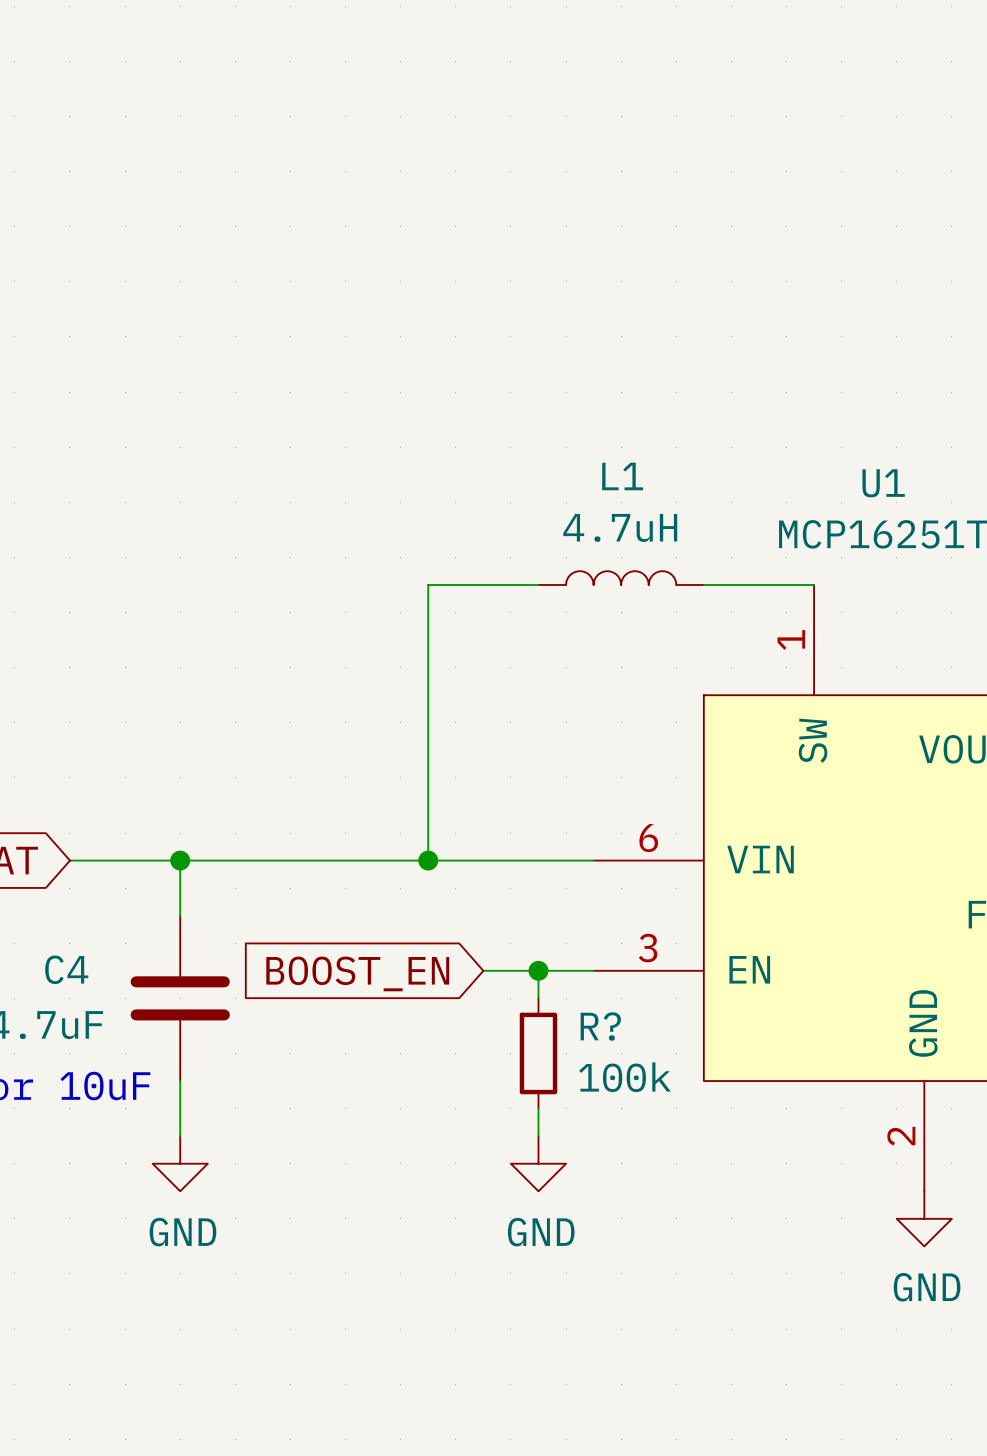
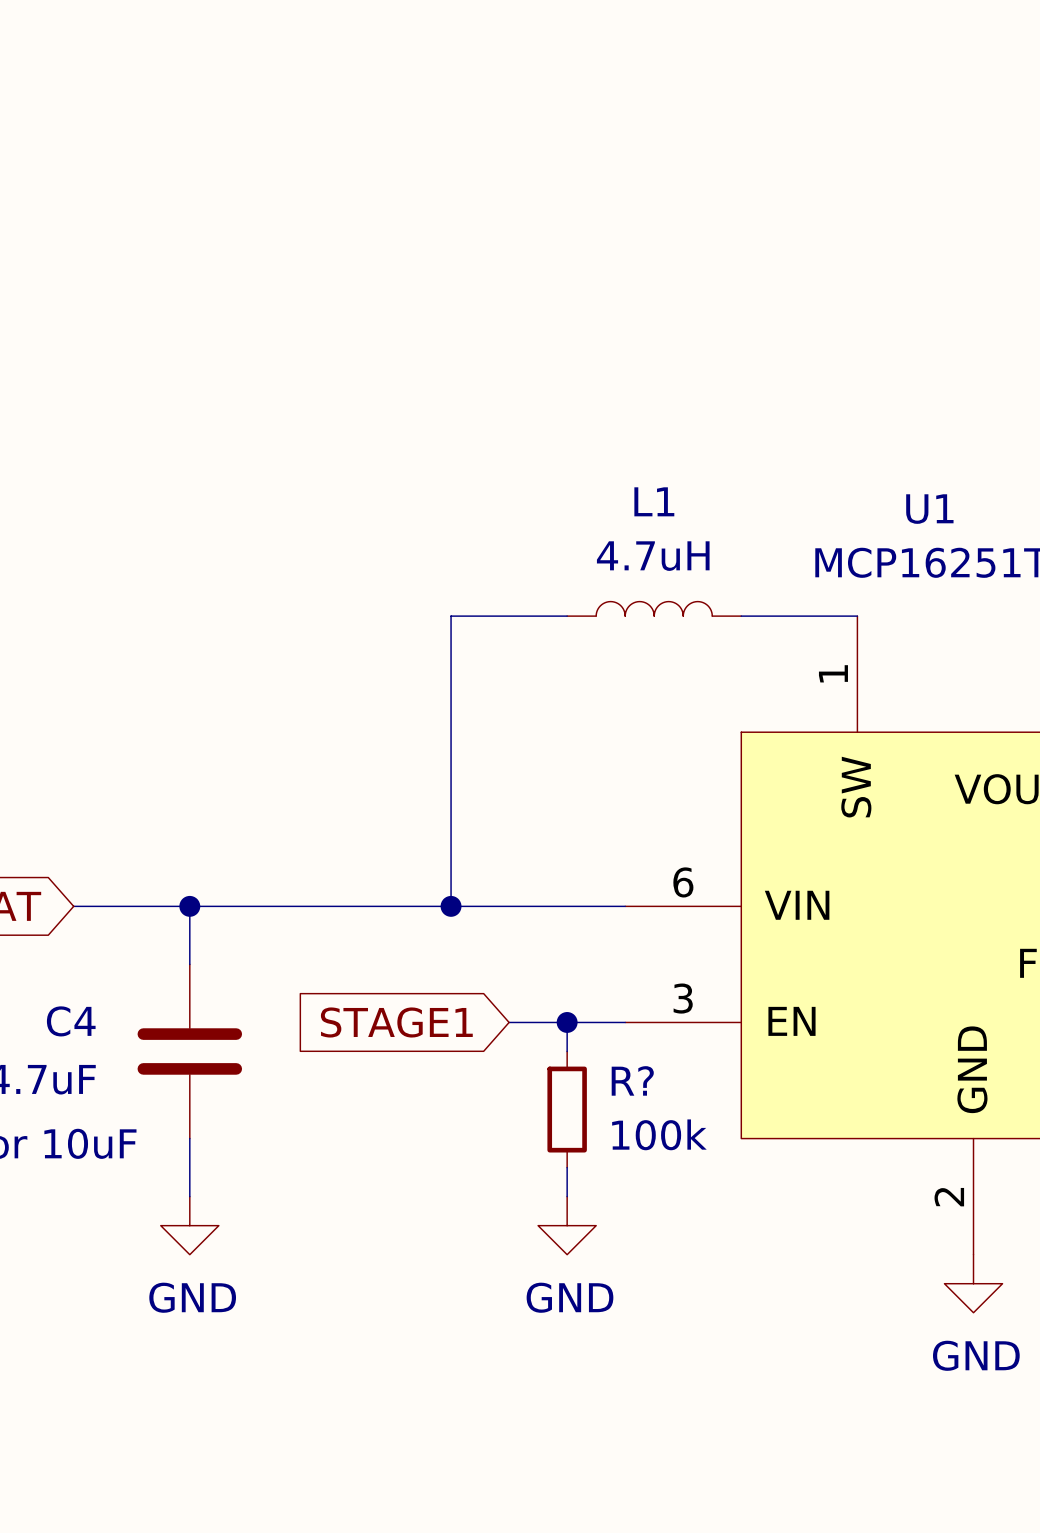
global label: BOOST_EN (357, 973) -> STAGE1 (396, 1022)

